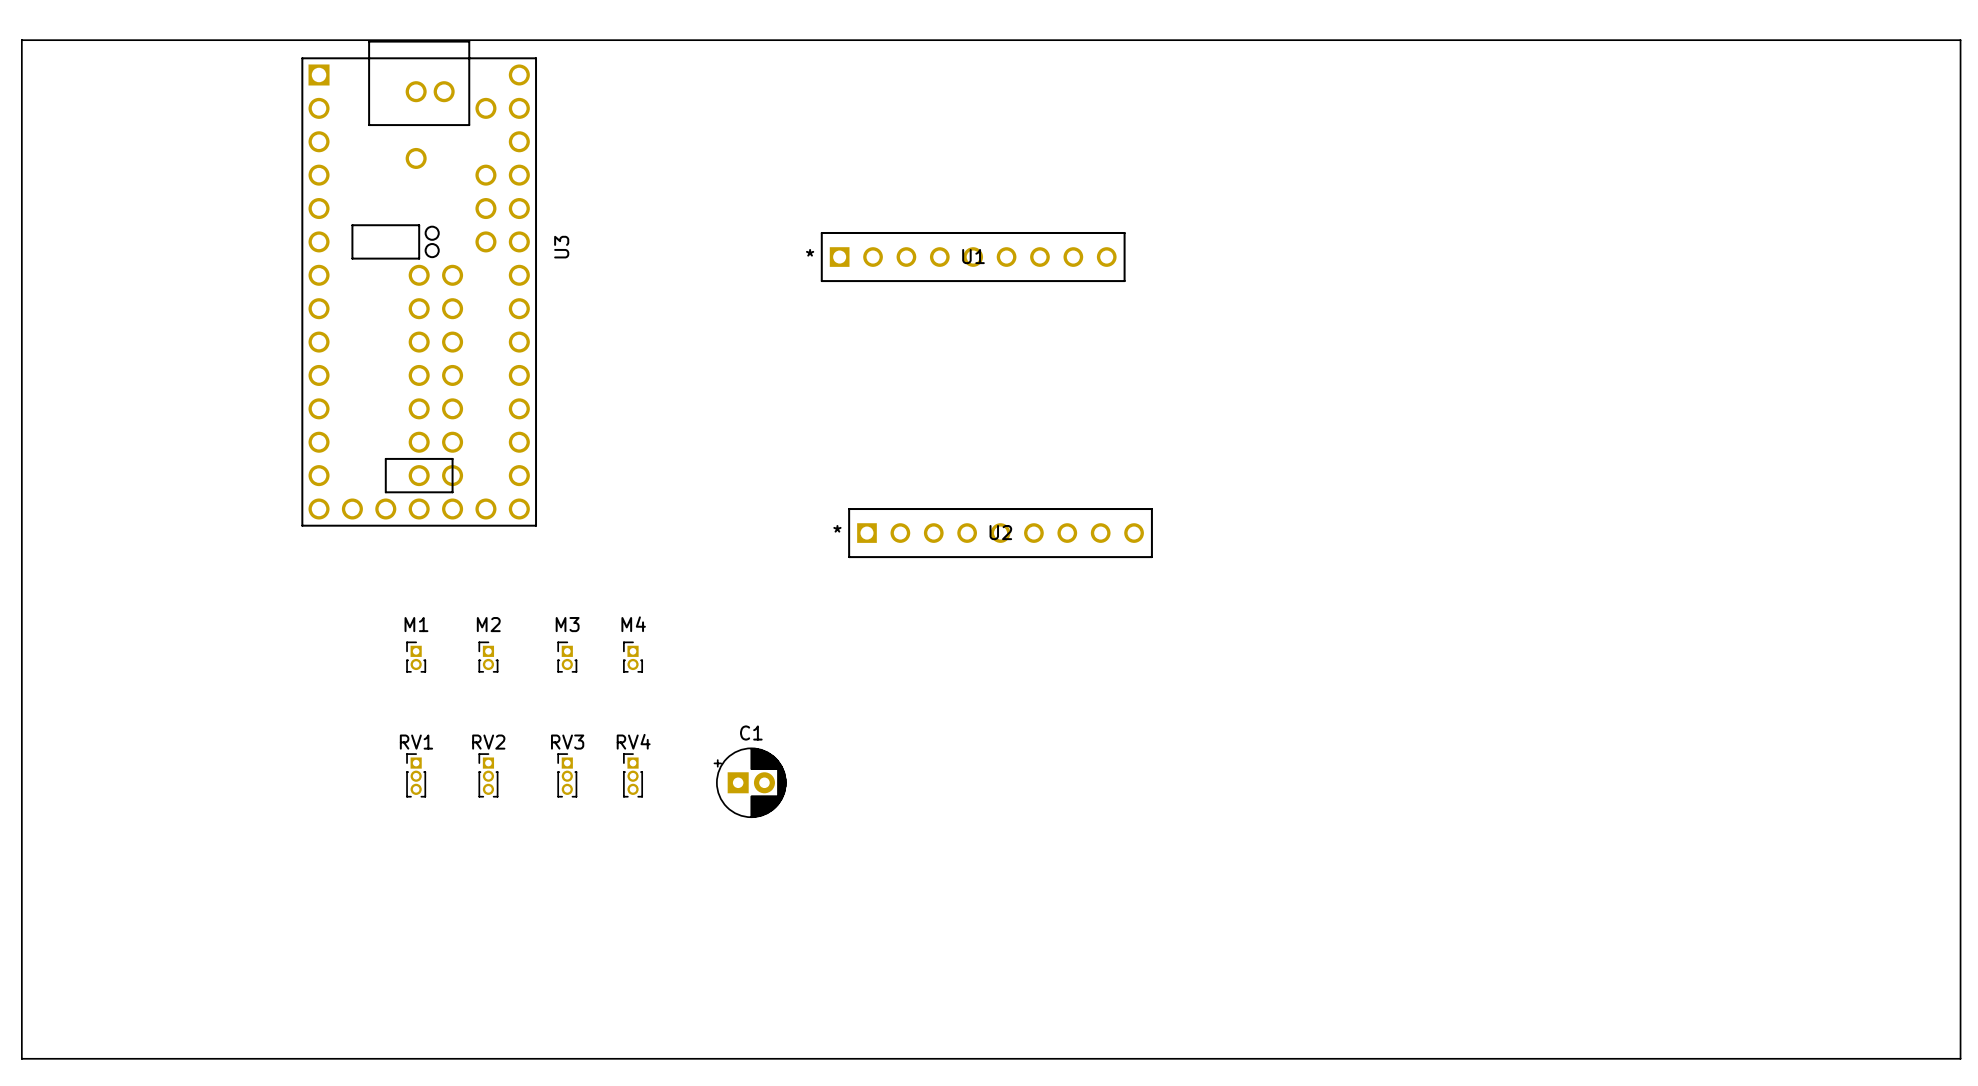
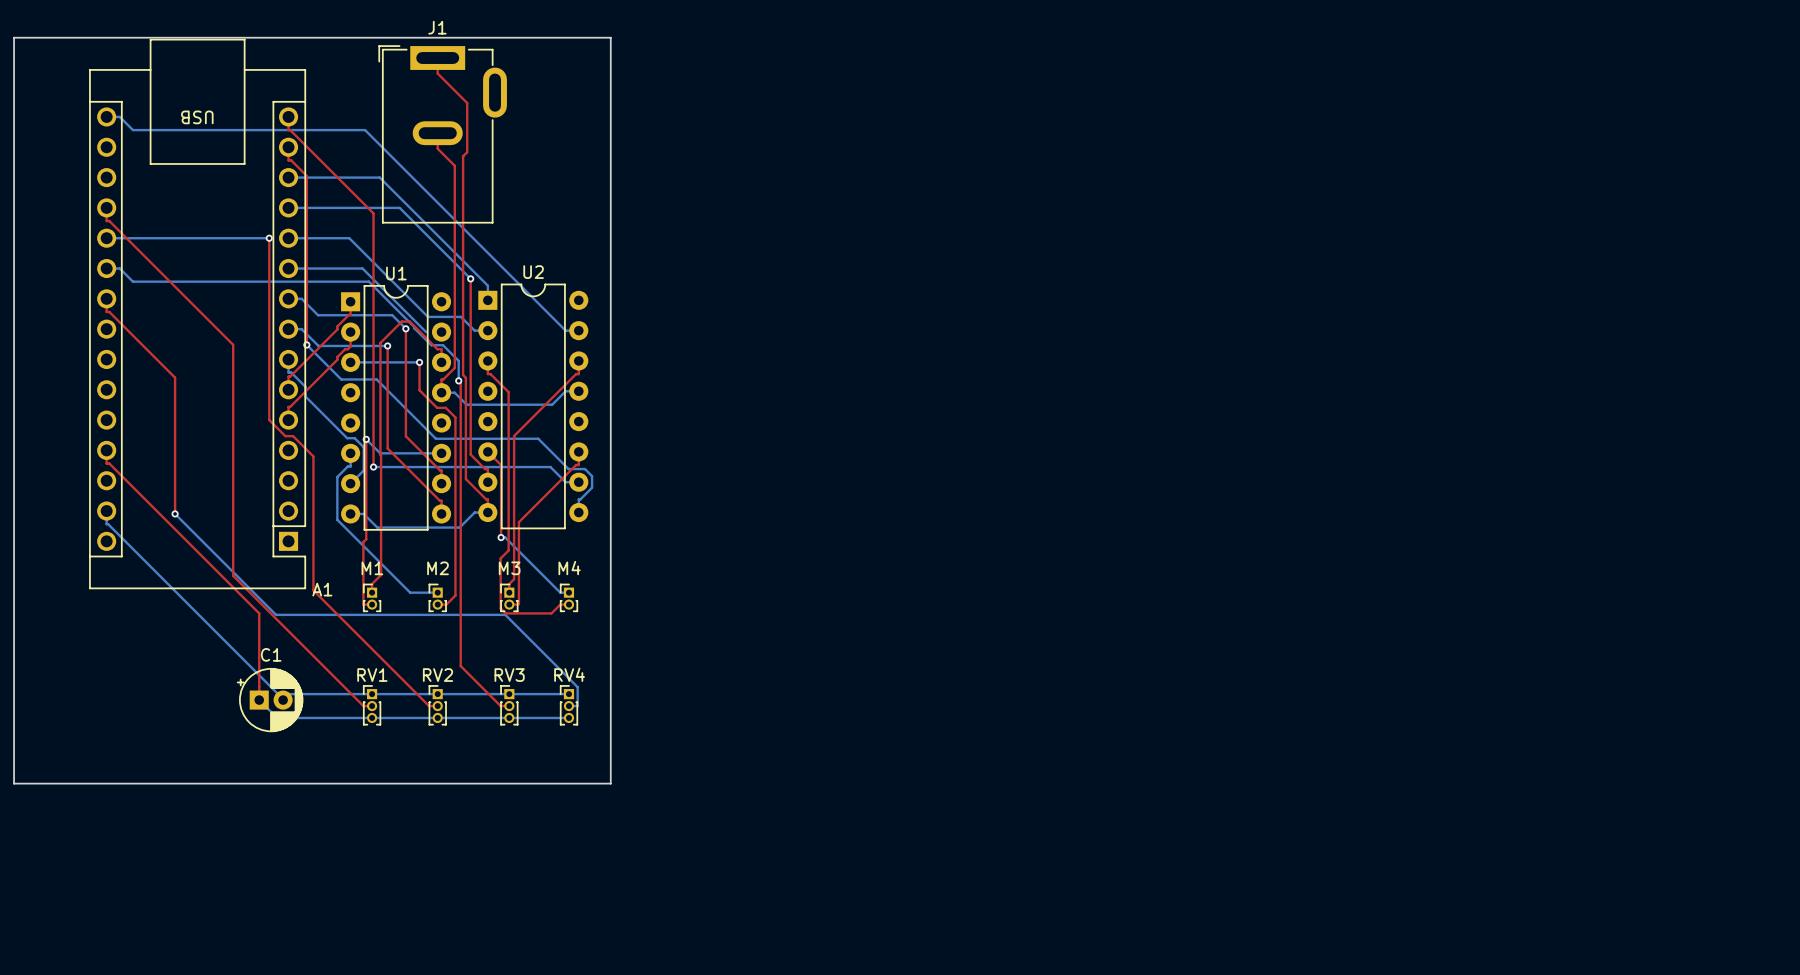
board edge: (679, 40) (1960, 40) (1960, 1058) (21, 1058) (21, 861) -> (610, 37) (610, 783) (14, 783)
top track: none -> (437, 58) (437, 73) (467, 103) (467, 152) (463, 156) (463, 375) (465, 377) (465, 479) (487, 499) (487, 512)
bottom track: none -> (106, 116) (119, 116) (132, 130) (365, 130) (565, 330) (578, 330)
top track: none -> (288, 116) (288, 130) (373, 213) (373, 467)
top track: none -> (437, 133) (437, 148) (454, 165) (454, 367) (441, 379) (441, 392)
J1: none -> (442, 134)
top track: none -> (288, 147) (288, 160) (291, 160) (306, 176) (306, 344)
bottom track: none -> (288, 177) (379, 177) (487, 285) (487, 300)
top track: none -> (106, 207) (106, 221) (109, 221) (233, 344) (233, 575) (363, 706) (372, 706)
bottom track: none -> (288, 207) (399, 207) (470, 278)
U1 footprint: [820, 231, 1126, 283] -> [341, 285, 452, 531]
U1 name position: U1 (973, 256) -> U1 (396, 273)
bottom track: none -> (106, 238) (269, 238)
top track: none -> (269, 238) (269, 420) (285, 436) (293, 436) (313, 456) (313, 590) (429, 706) (437, 706)
via: none -> (269, 238)
bottom track: none -> (288, 238) (349, 238) (427, 316) (460, 316) (474, 330) (487, 330)
U3: (419, 283) -> none
bottom track: none -> (106, 268) (119, 268) (132, 281) (368, 281) (431, 345) (443, 345) (458, 360) (458, 380)
bottom track: none -> (288, 268) (362, 268) (426, 332)
top track: none -> (470, 278) (470, 454) (485, 469) (487, 469) (487, 482)
via: none -> (470, 278)
top track: none -> (106, 298) (106, 311) (109, 311) (175, 377) (175, 513)
bottom track: none -> (288, 298) (301, 298) (318, 315) (392, 315) (405, 328)
top track: none -> (350, 301) (350, 314) (288, 376) (288, 389)
A1: none -> (197, 314)
top track: none -> (405, 328) (405, 436) (441, 470) (441, 483)
via: none -> (405, 328)
bottom track: none -> (288, 329) (301, 329) (318, 345) (387, 345)
top track: none -> (350, 332) (350, 346) (345, 349) (337, 356) (337, 359) (288, 406) (288, 420)
bottom track: none -> (306, 344) (341, 379) (376, 379) (435, 438) (538, 438) (568, 469) (584, 469) (592, 476) (592, 487) (578, 499) (578, 512)
via: none -> (306, 344)
top track: none -> (387, 345) (387, 448) (441, 500) (441, 513)
via: none -> (387, 345)
bottom track: none -> (288, 359) (288, 372) (291, 372) (305, 387) (305, 396) (347, 438) (354, 438) (363, 447) (363, 470) (350, 483)
top track: none -> (487, 360) (487, 374) (490, 374) (508, 392) (508, 550) (500, 558) (500, 608) (505, 613) (551, 613) (560, 604) (569, 604)
top track: none -> (578, 360) (578, 374) (576, 374) (514, 436) (514, 579) (509, 583) (509, 592)
bottom track: none -> (350, 362) (419, 362)
top track: none -> (419, 362) (419, 390) (437, 407) (445, 407) (455, 417) (455, 595) (446, 604) (437, 604)
via: none -> (419, 362)
top track: none -> (441, 362) (441, 349) (437, 349) (409, 321) (401, 321) (380, 342) (381, 575) (372, 583) (372, 592)
top track: none -> (458, 380) (460, 382) (460, 666) (500, 706) (509, 706)
via: none -> (458, 380)
bottom track: none -> (578, 391) (565, 391) (552, 404) (466, 404) (454, 392) (441, 392)
bottom track: none -> (366, 439) (380, 453) (441, 453)
top track: none -> (366, 439) (366, 539) (363, 542) (363, 604) (372, 604)
via: none -> (366, 439)
top track: none -> (106, 450) (106, 463) (109, 463) (259, 613) (259, 700)
top track: none -> (487, 451) (501, 465) (501, 537)
top track: none -> (578, 451) (578, 465) (576, 465) (518, 522) (518, 603) (509, 604)
bottom track: none -> (350, 453) (350, 466) (347, 466) (337, 477) (337, 519) (410, 592) (437, 592)
U2 footprint: [848, 508, 1153, 559] -> [478, 283, 589, 530]
bottom track: none -> (373, 467) (550, 467) (565, 482) (578, 482)
via: none -> (373, 467)
U2 name position: U2 (1000, 532) -> U2 (533, 272)
bottom track: none -> (106, 511) (106, 524) (283, 699)
bottom track: none -> (487, 512) (474, 512) (459, 527) (377, 527) (363, 513) (350, 513)
bottom track: none -> (175, 513) (276, 614) (505, 614) (577, 687) (577, 706) (569, 706)
via: none -> (175, 513)
bottom track: none -> (501, 537) (505, 537) (560, 592) (569, 592)
via: none -> (501, 537)
bottom track: none -> (569, 694) (288, 694) (283, 699)
bottom track: none -> (259, 700) (277, 717) (569, 717)
C1 position: (750, 782) -> (270, 700)

